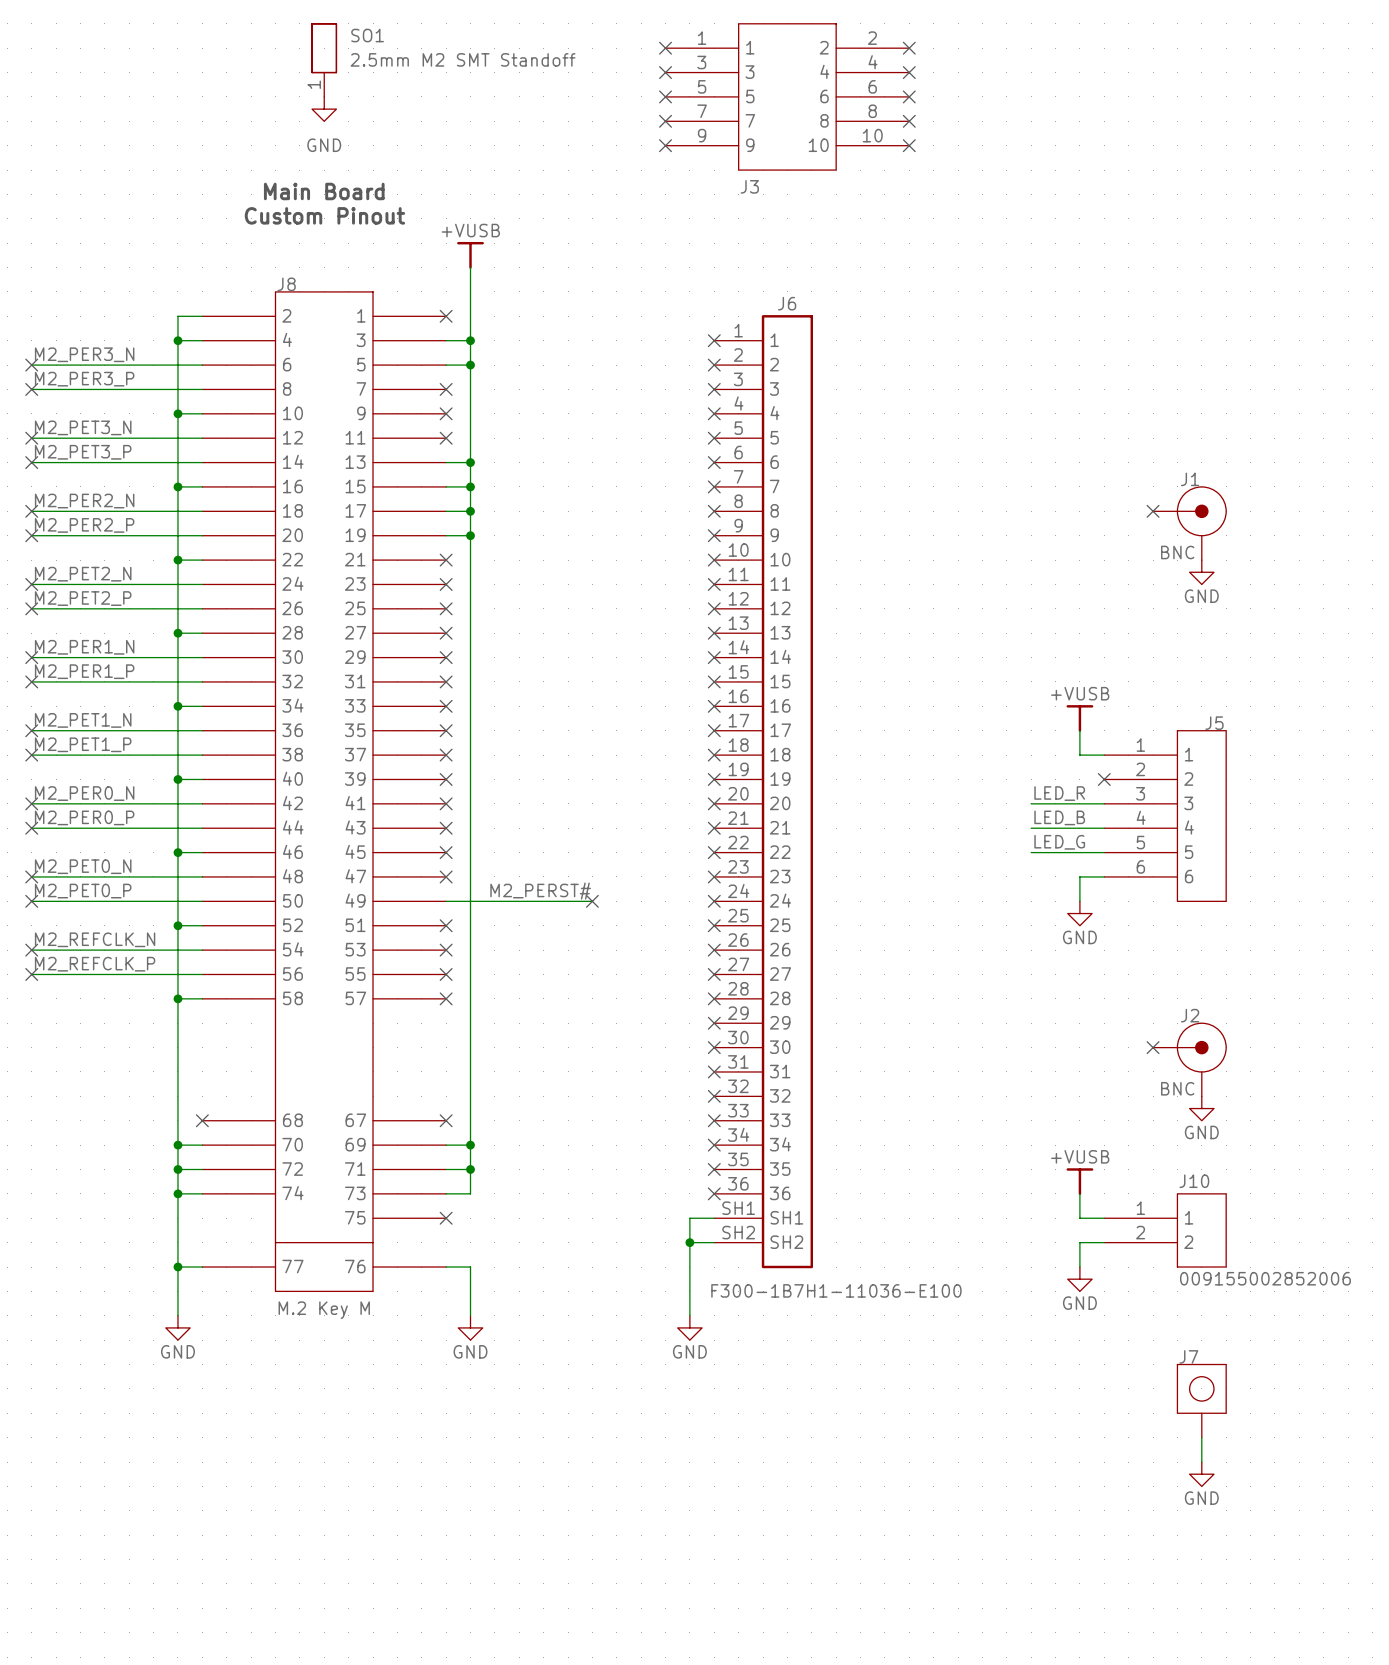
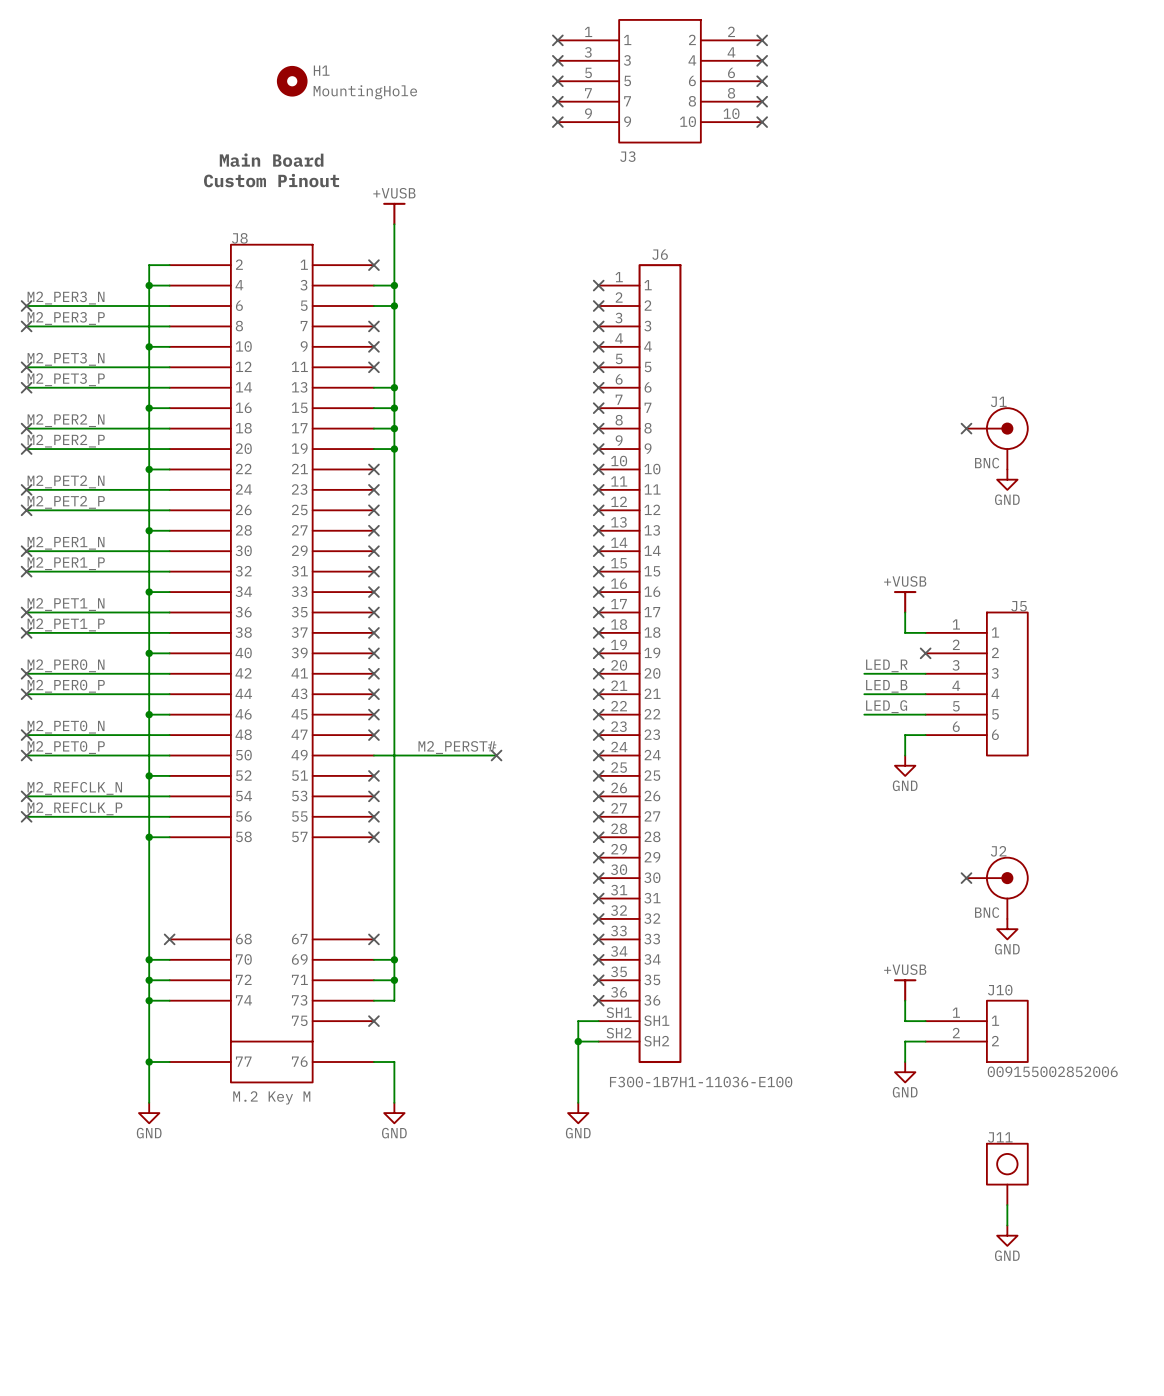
SO1: 2.5mm M2 SMT Standoff (324, 60) -> none
H1: none -> MountingHole (292, 81)
power symbol: GND (324, 109) -> none
J7 name: J7 (1188, 1356) -> J11 (1000, 1137)

